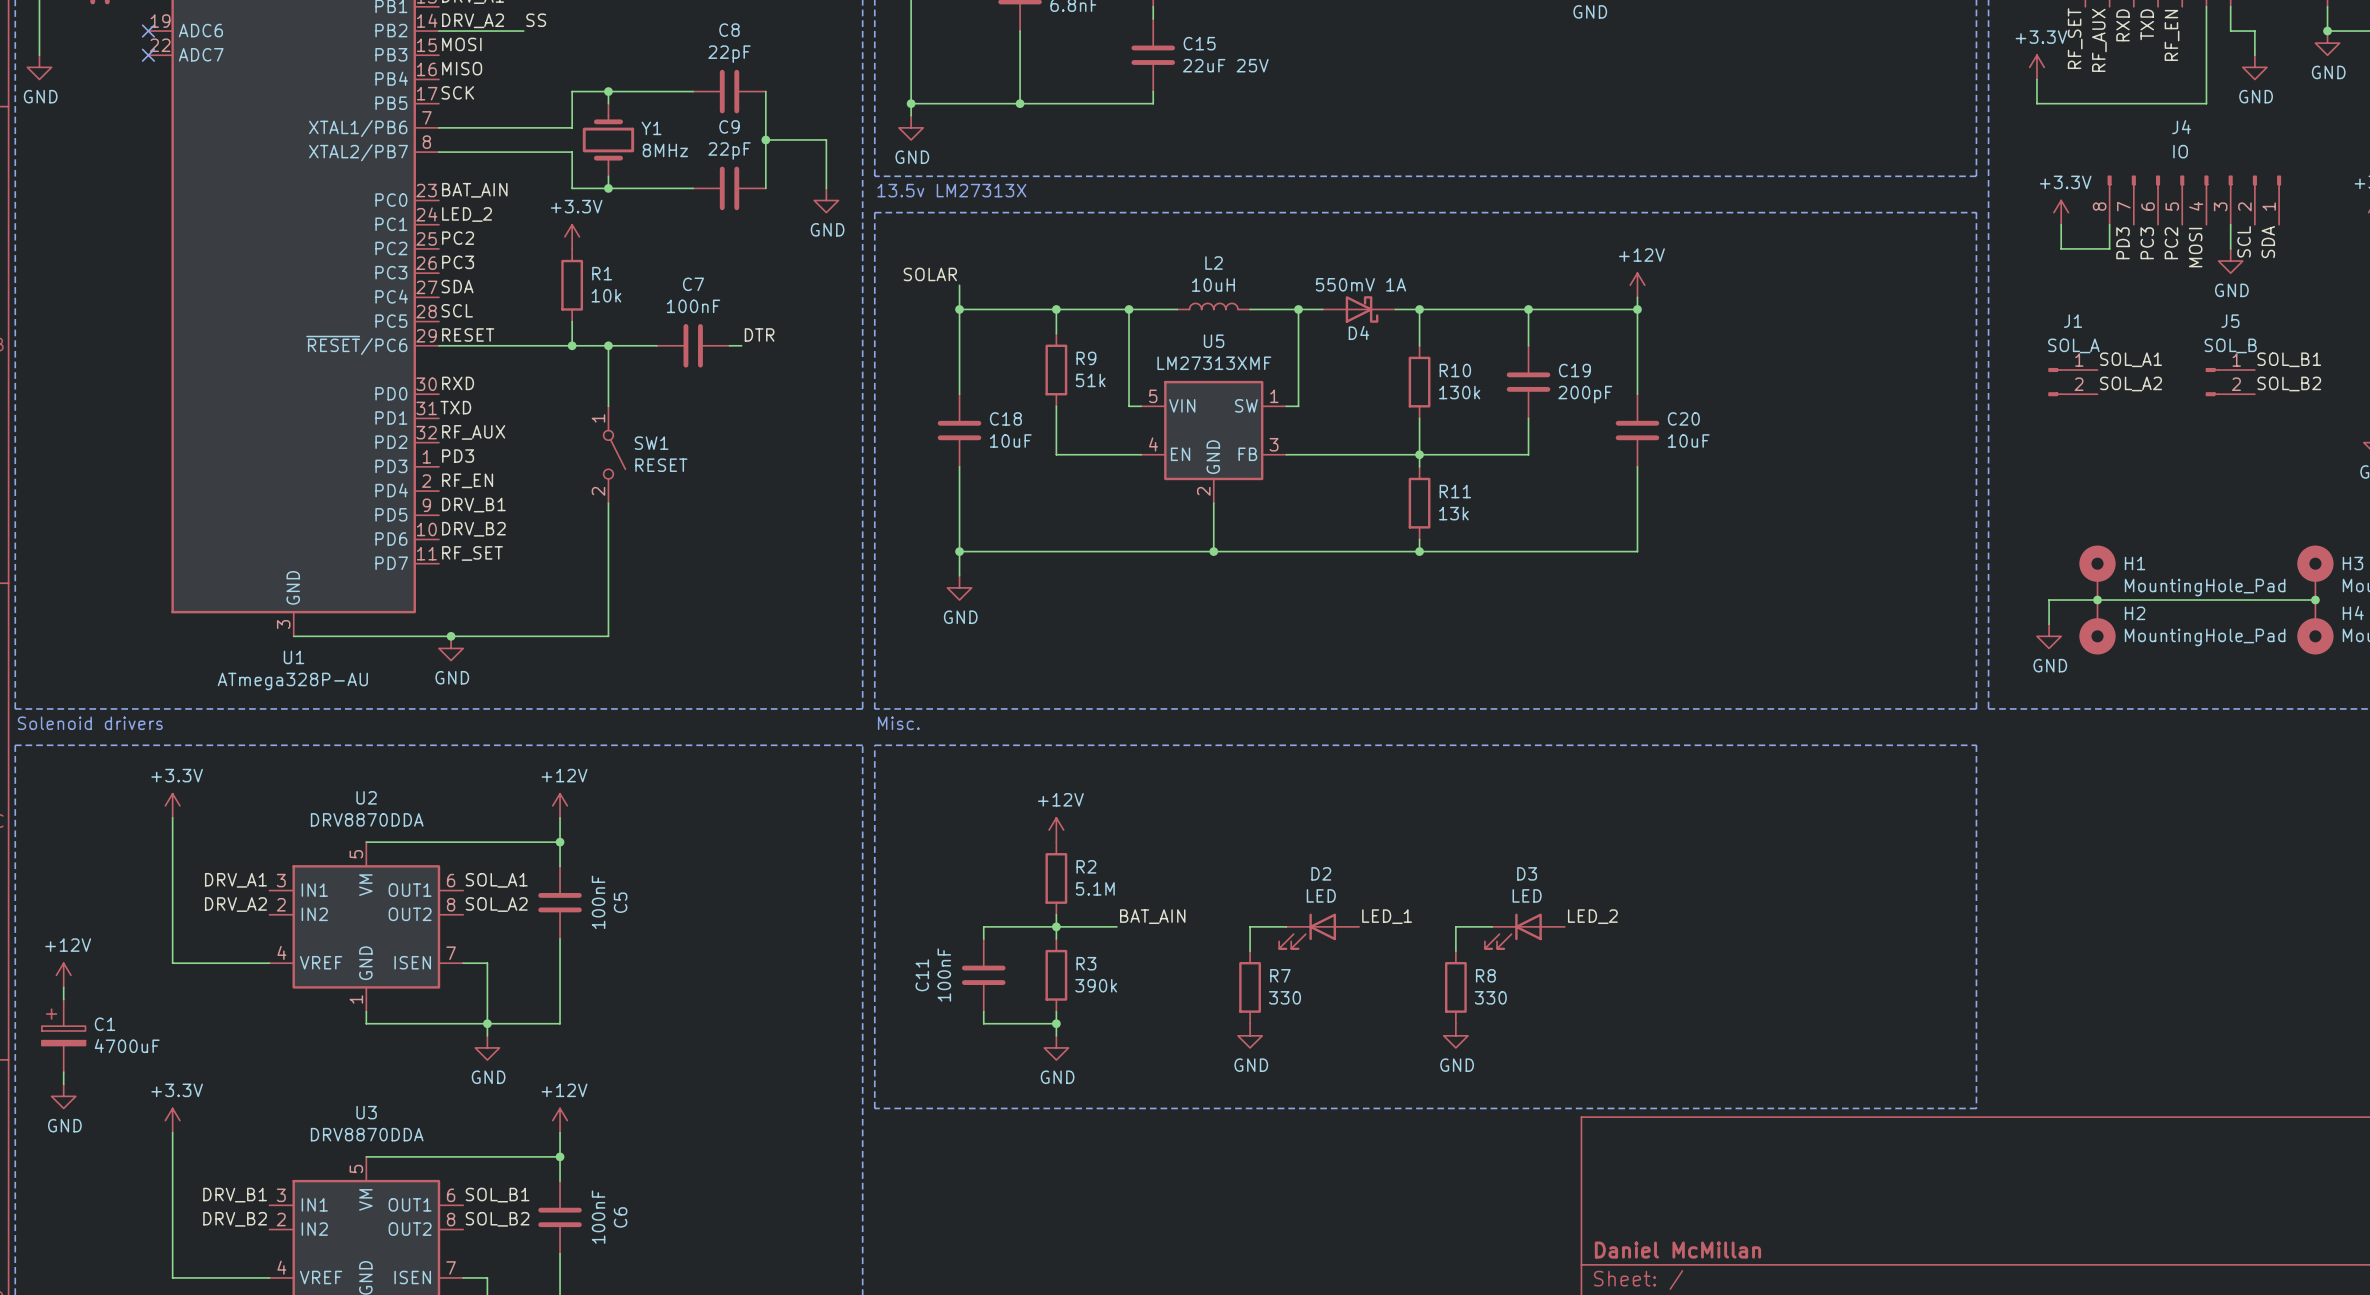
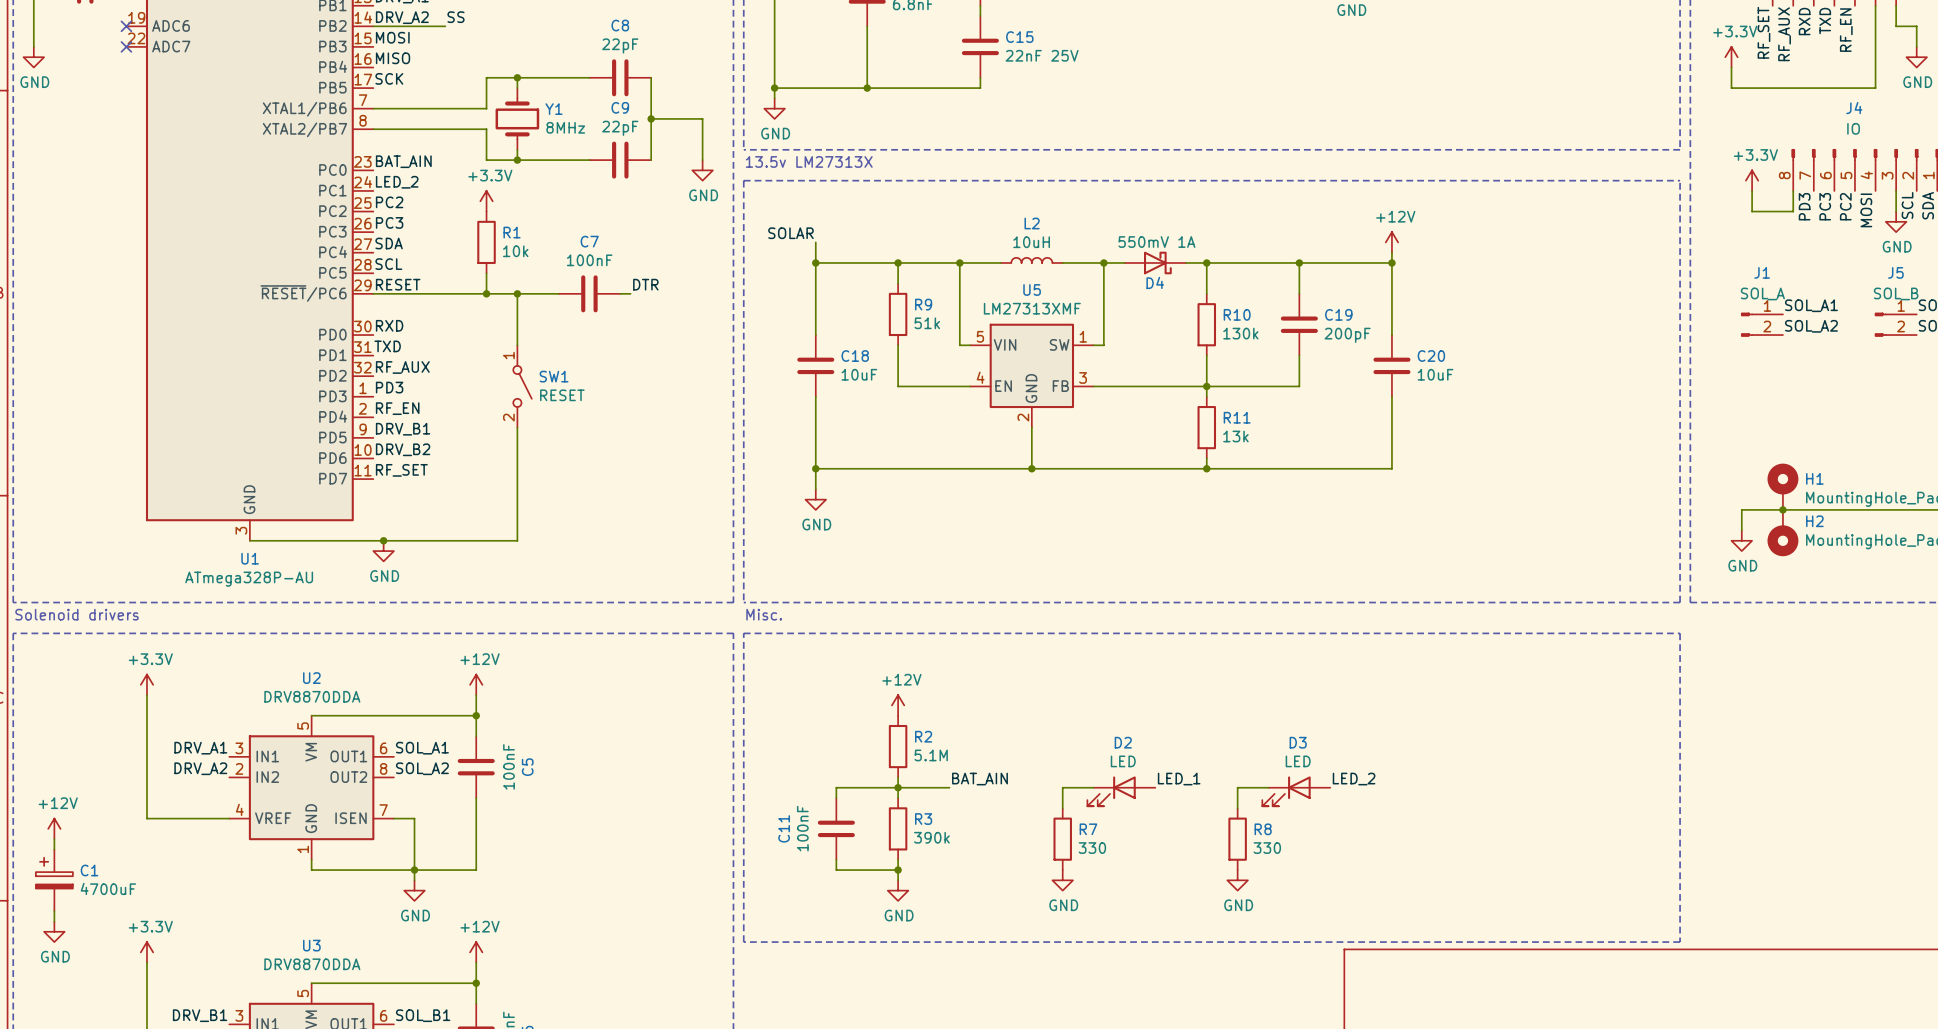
C15 value: 22uF 25V (1225, 65) -> 22nF 25V (1042, 55)

